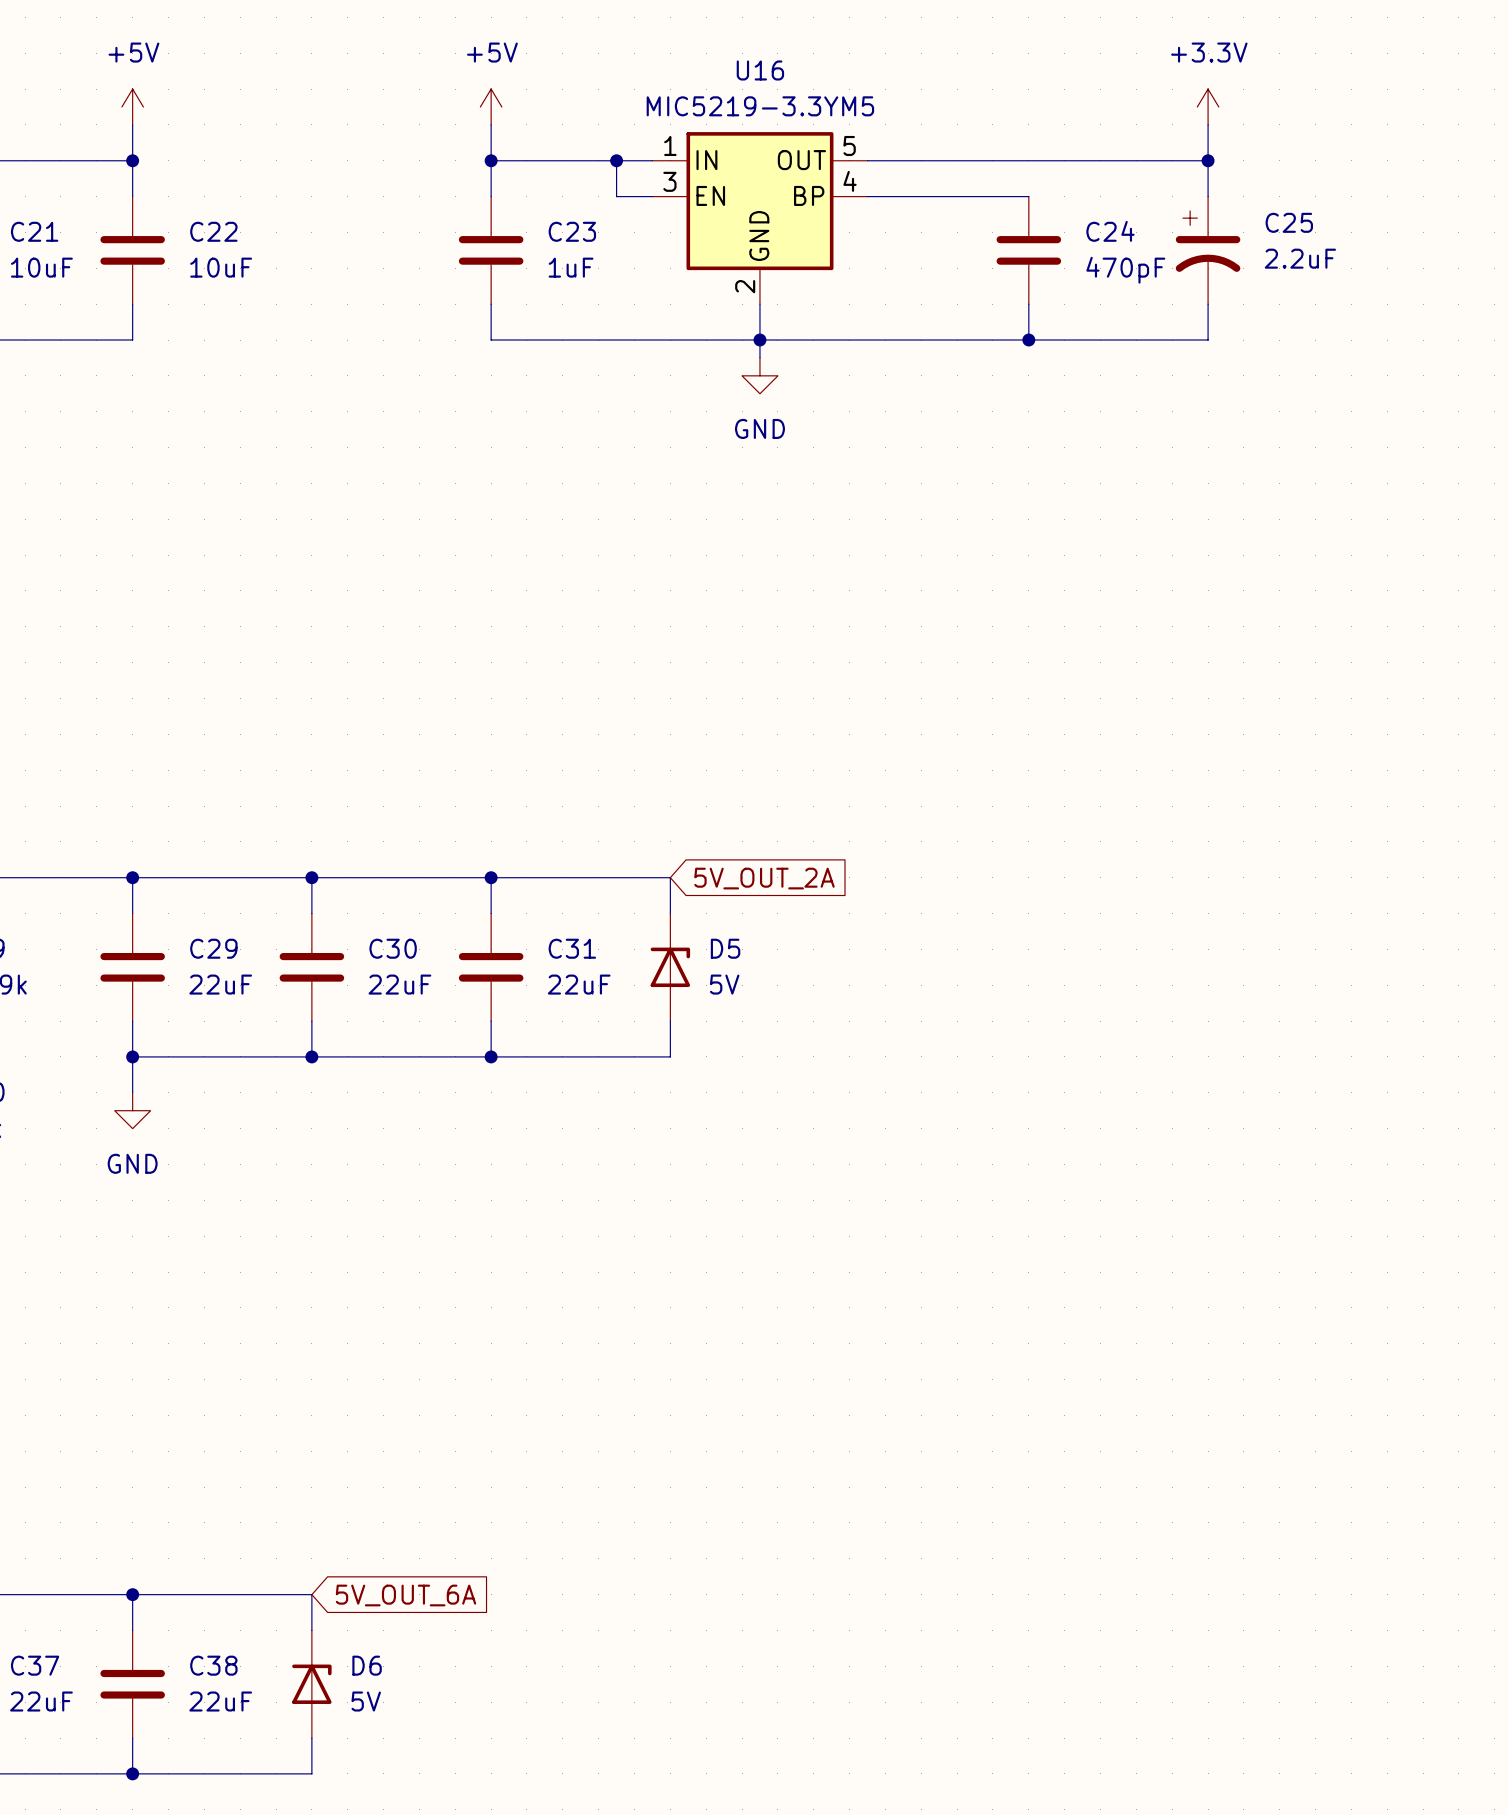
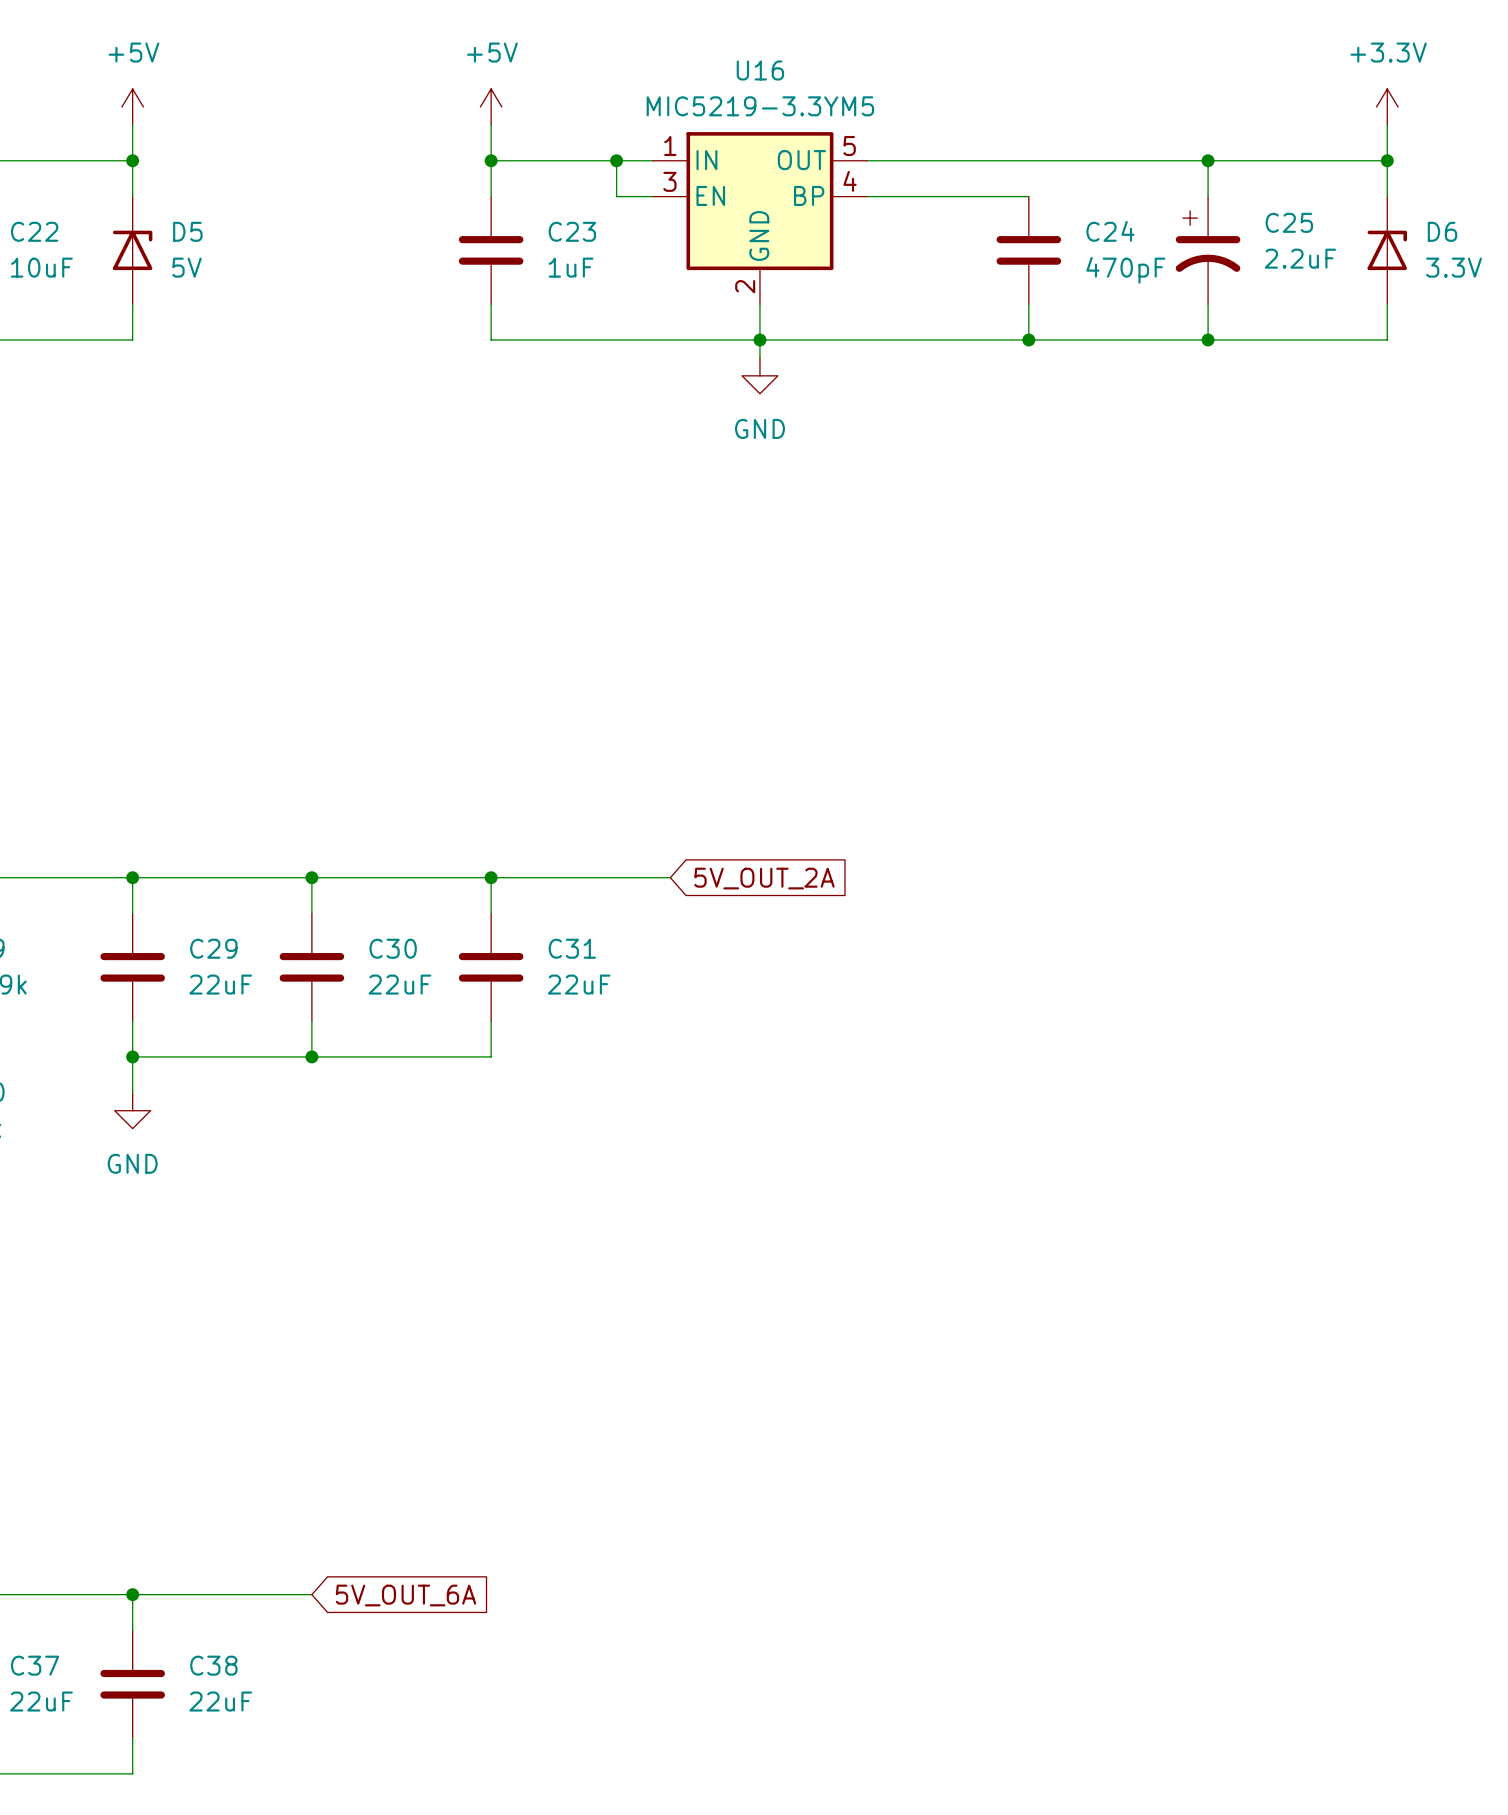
power symbol position: +3.3V (1208, 107) -> +3.3V (1387, 107)
wire: (1208, 124) (1208, 160) -> (1387, 160) (1208, 160)
wire: none -> (1387, 124) (1387, 196)
junction: none -> (1387, 160)
C21 name: C21 (34, 231) -> C22 (34, 231)
C22: 10uF (132, 250) -> none
wire: none -> (1387, 304) (1387, 340) (1208, 340)
junction: none -> (1208, 340)
wire: (670, 877) (670, 913) -> none
D5 position: (670, 967) -> (132, 250)
wire: (670, 1021) (670, 1056) (491, 1056) -> none
junction: (491, 1056) -> none
wire: (311, 1594) (311, 1630) -> none
D6 position: (311, 1684) -> (1387, 250)
D6 value: 5V (366, 1701) -> 3.3V (1454, 267)
wire: (311, 1738) (311, 1773) (132, 1773) -> none
junction: (132, 1773) -> none

